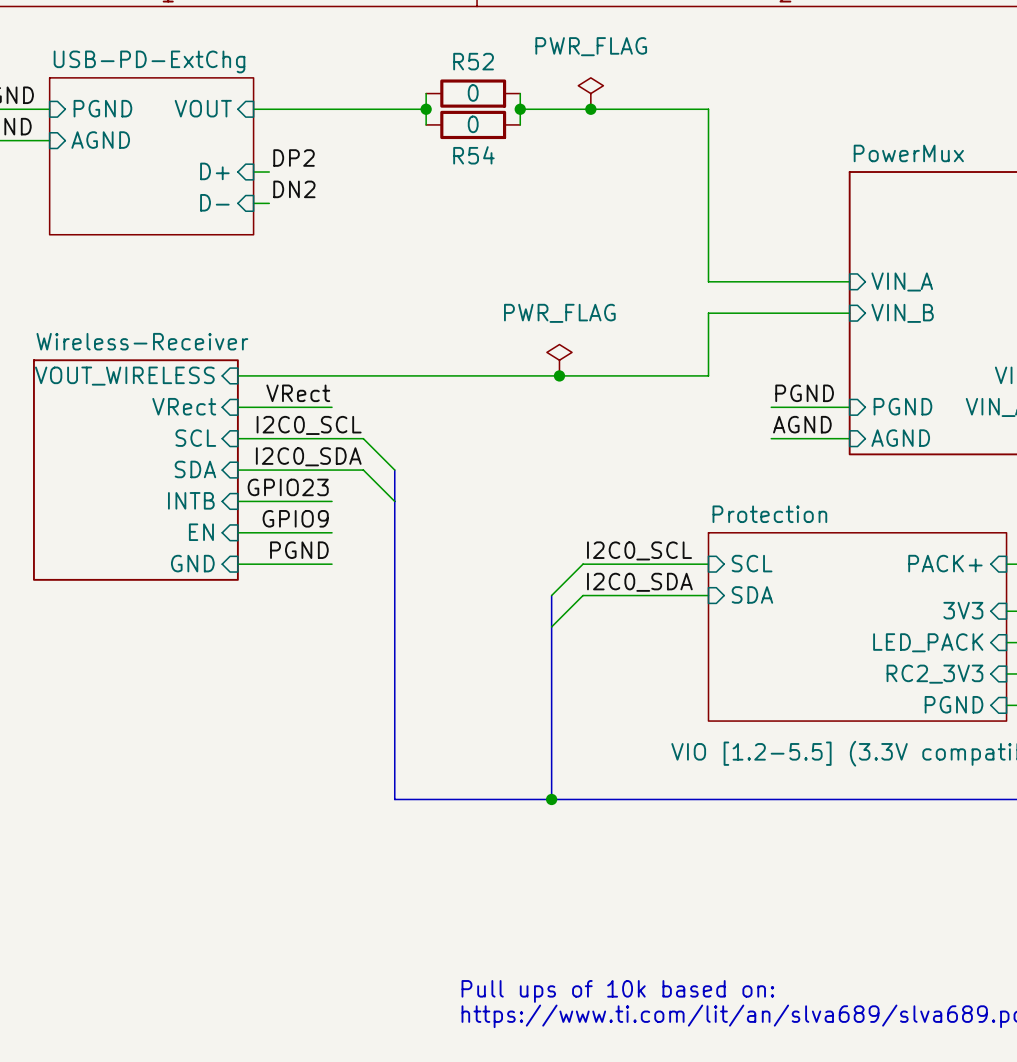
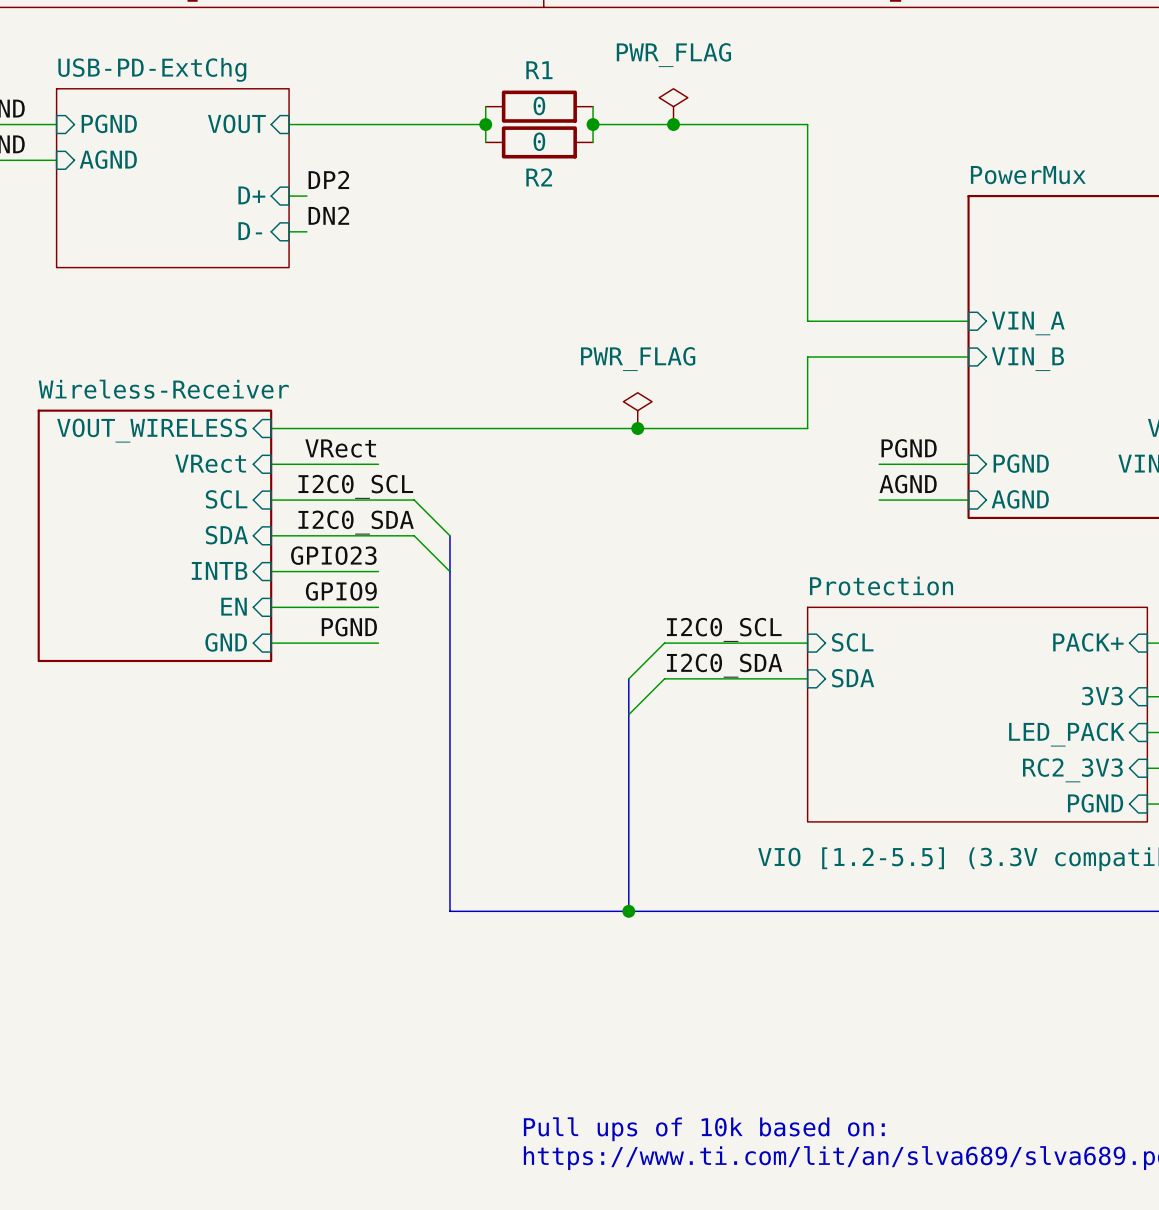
R52 name: R52 (473, 61) -> R1 (539, 70)
R54 name: R54 (473, 155) -> R2 (539, 177)

